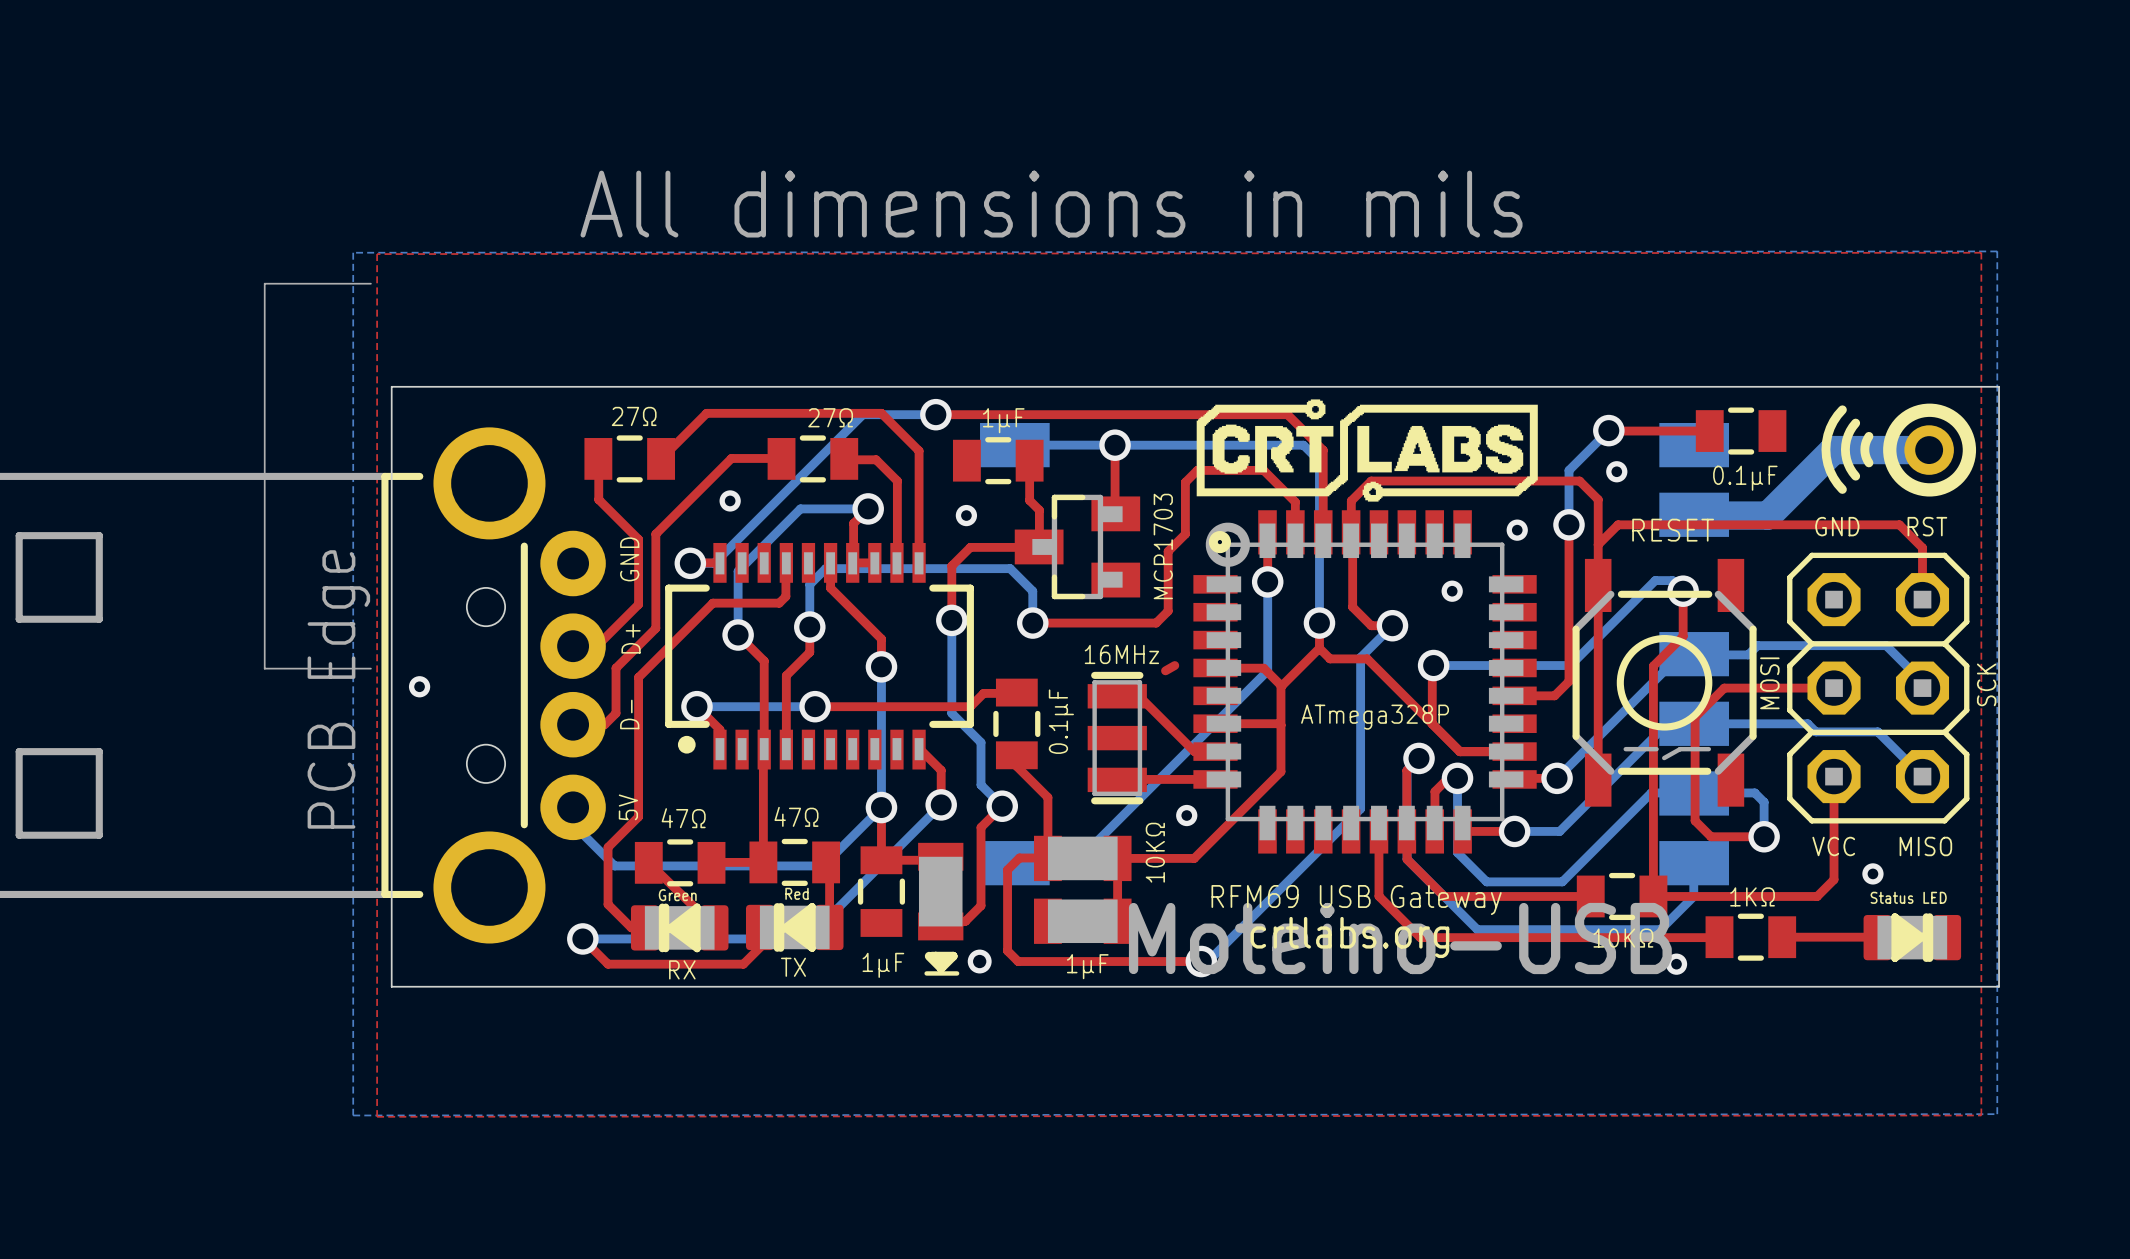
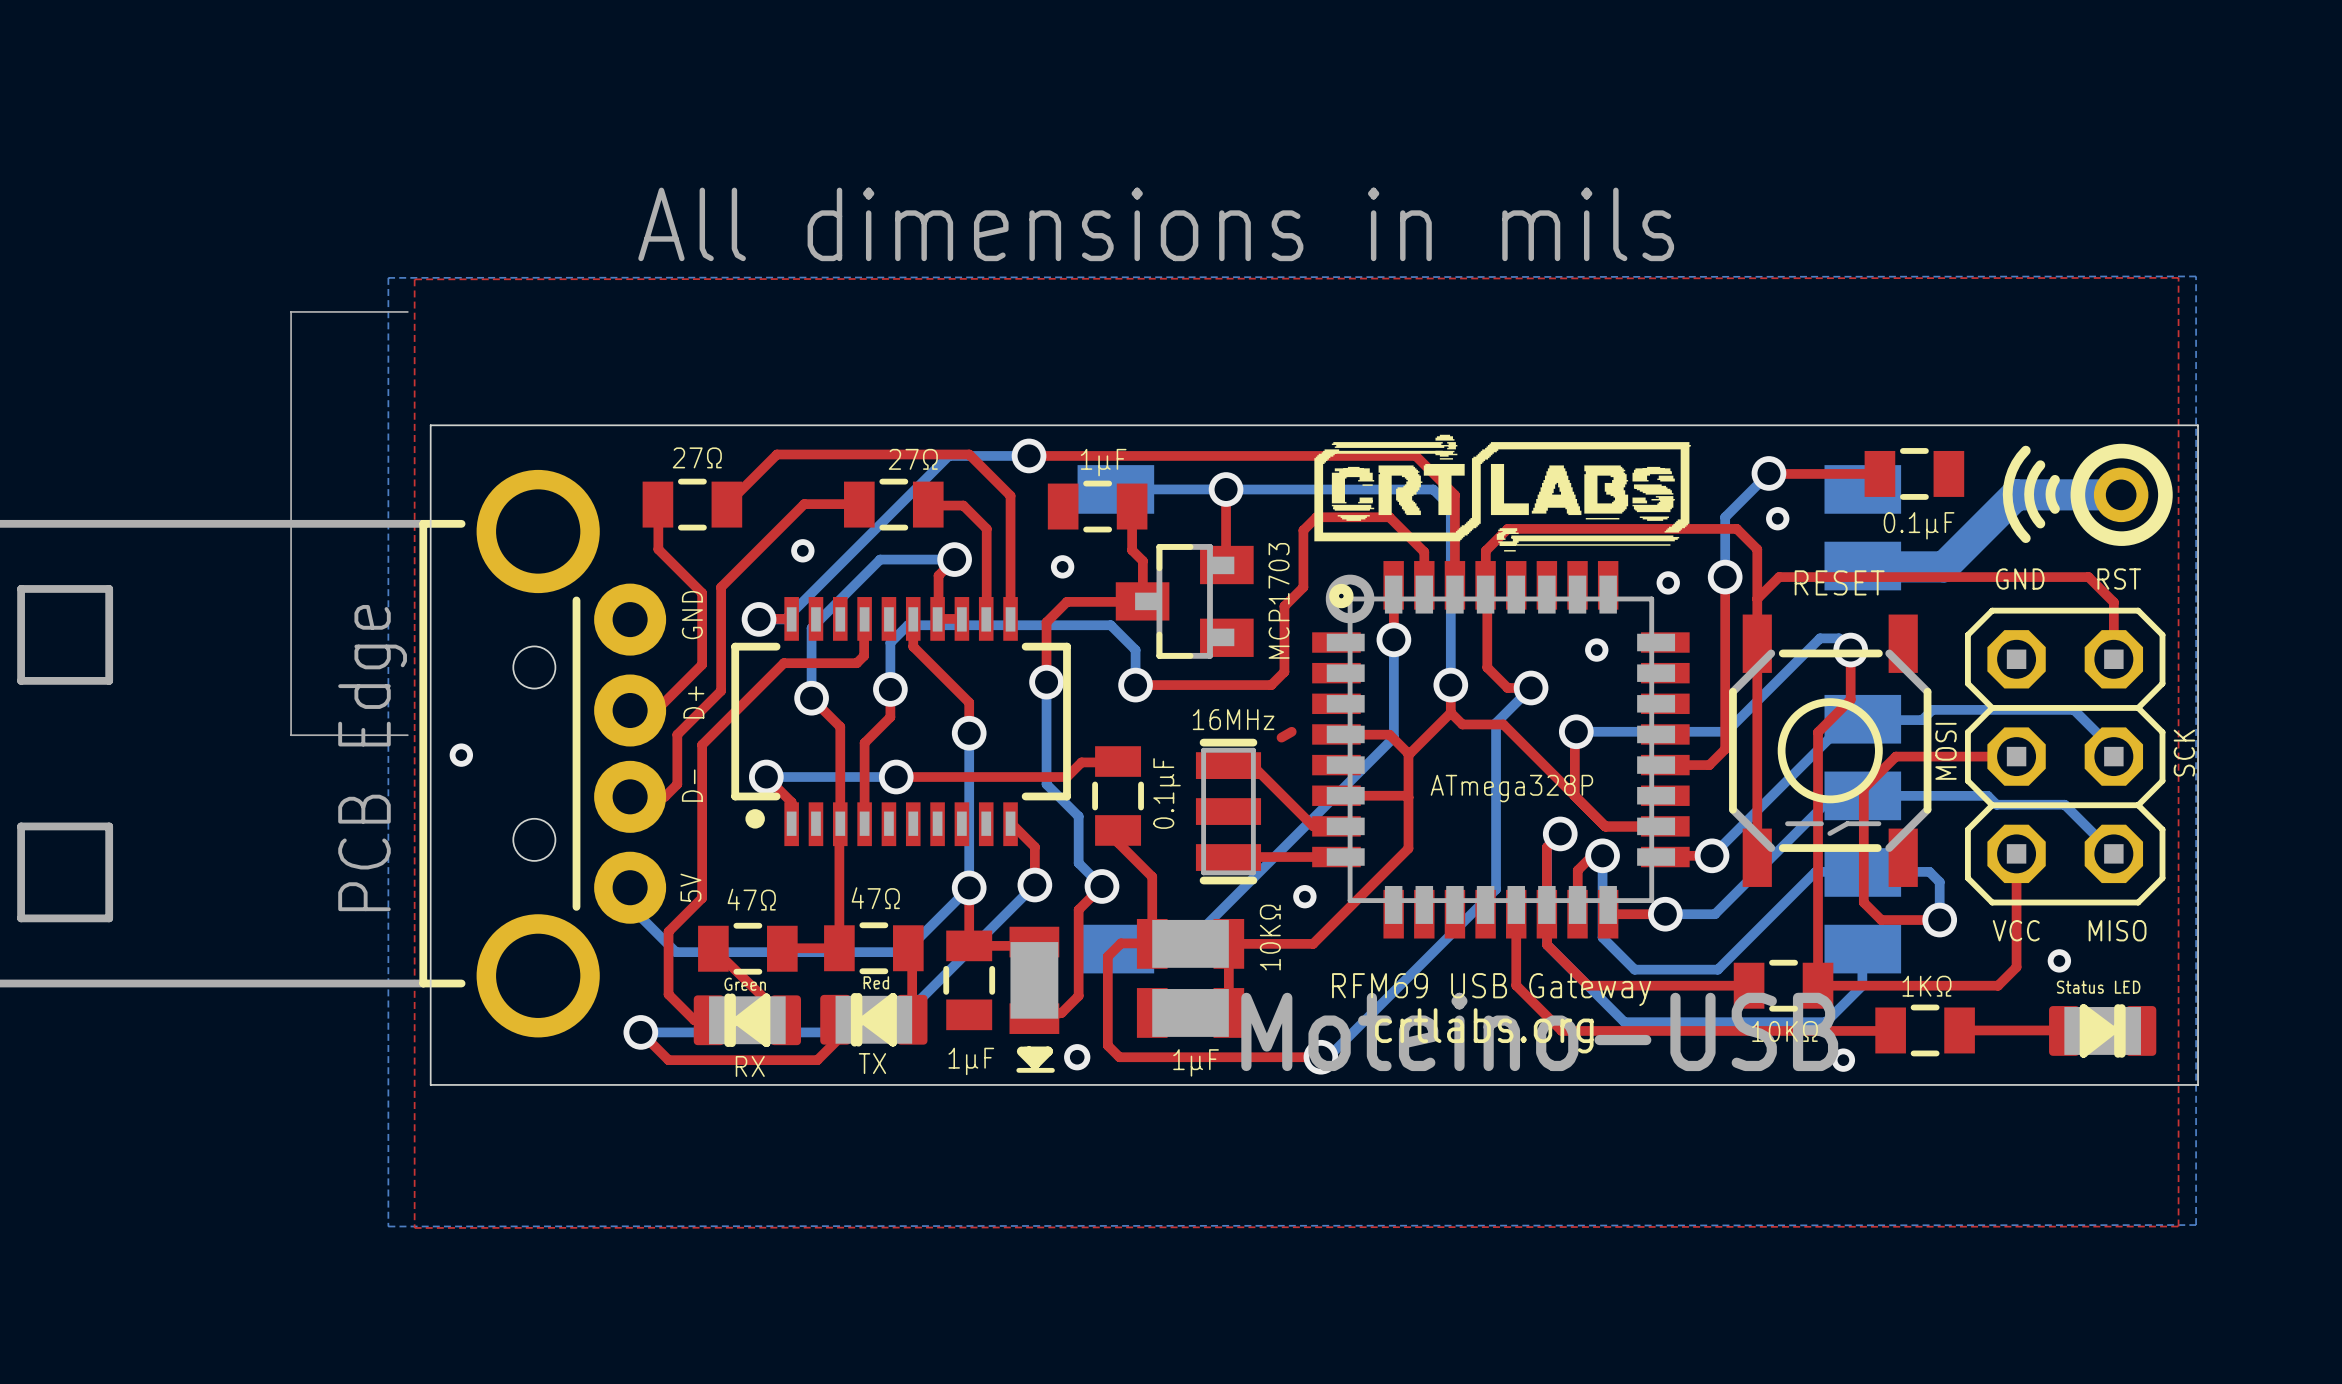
drawing: none -> [1314, 434, 1690, 546]
drawing: [1196, 399, 1538, 501] -> none

